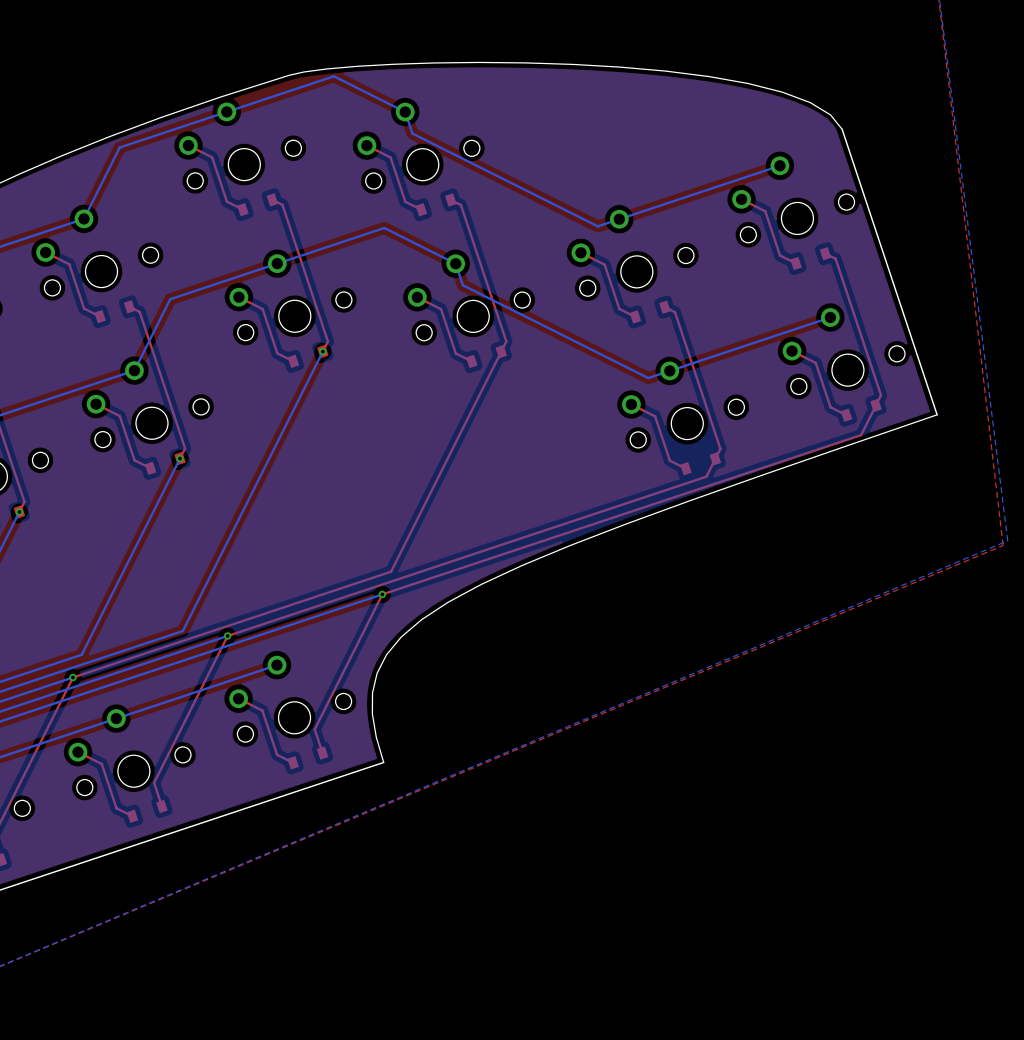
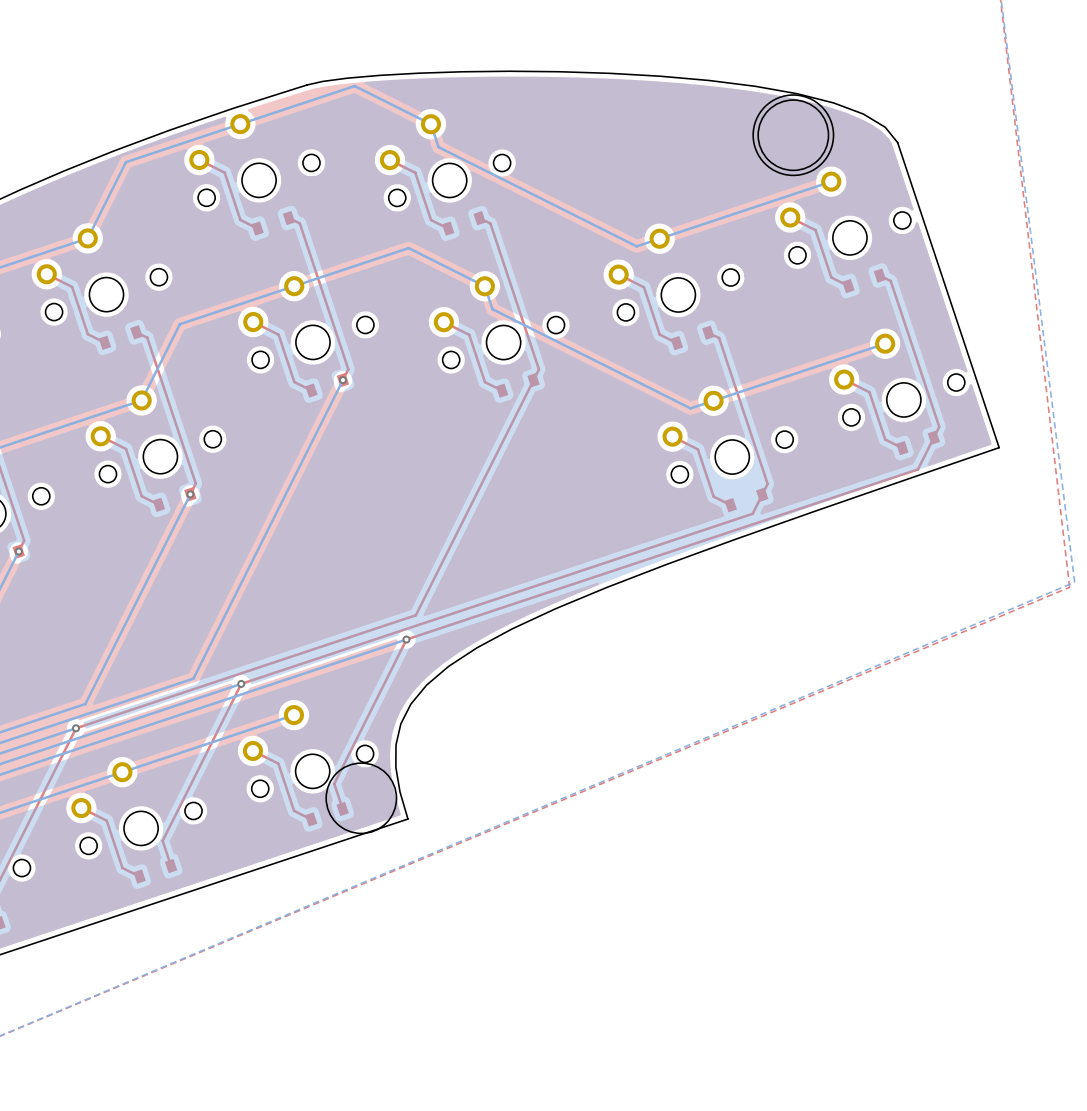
drawing: none -> [752, 94, 835, 176]
drawing: none -> [325, 762, 398, 835]

